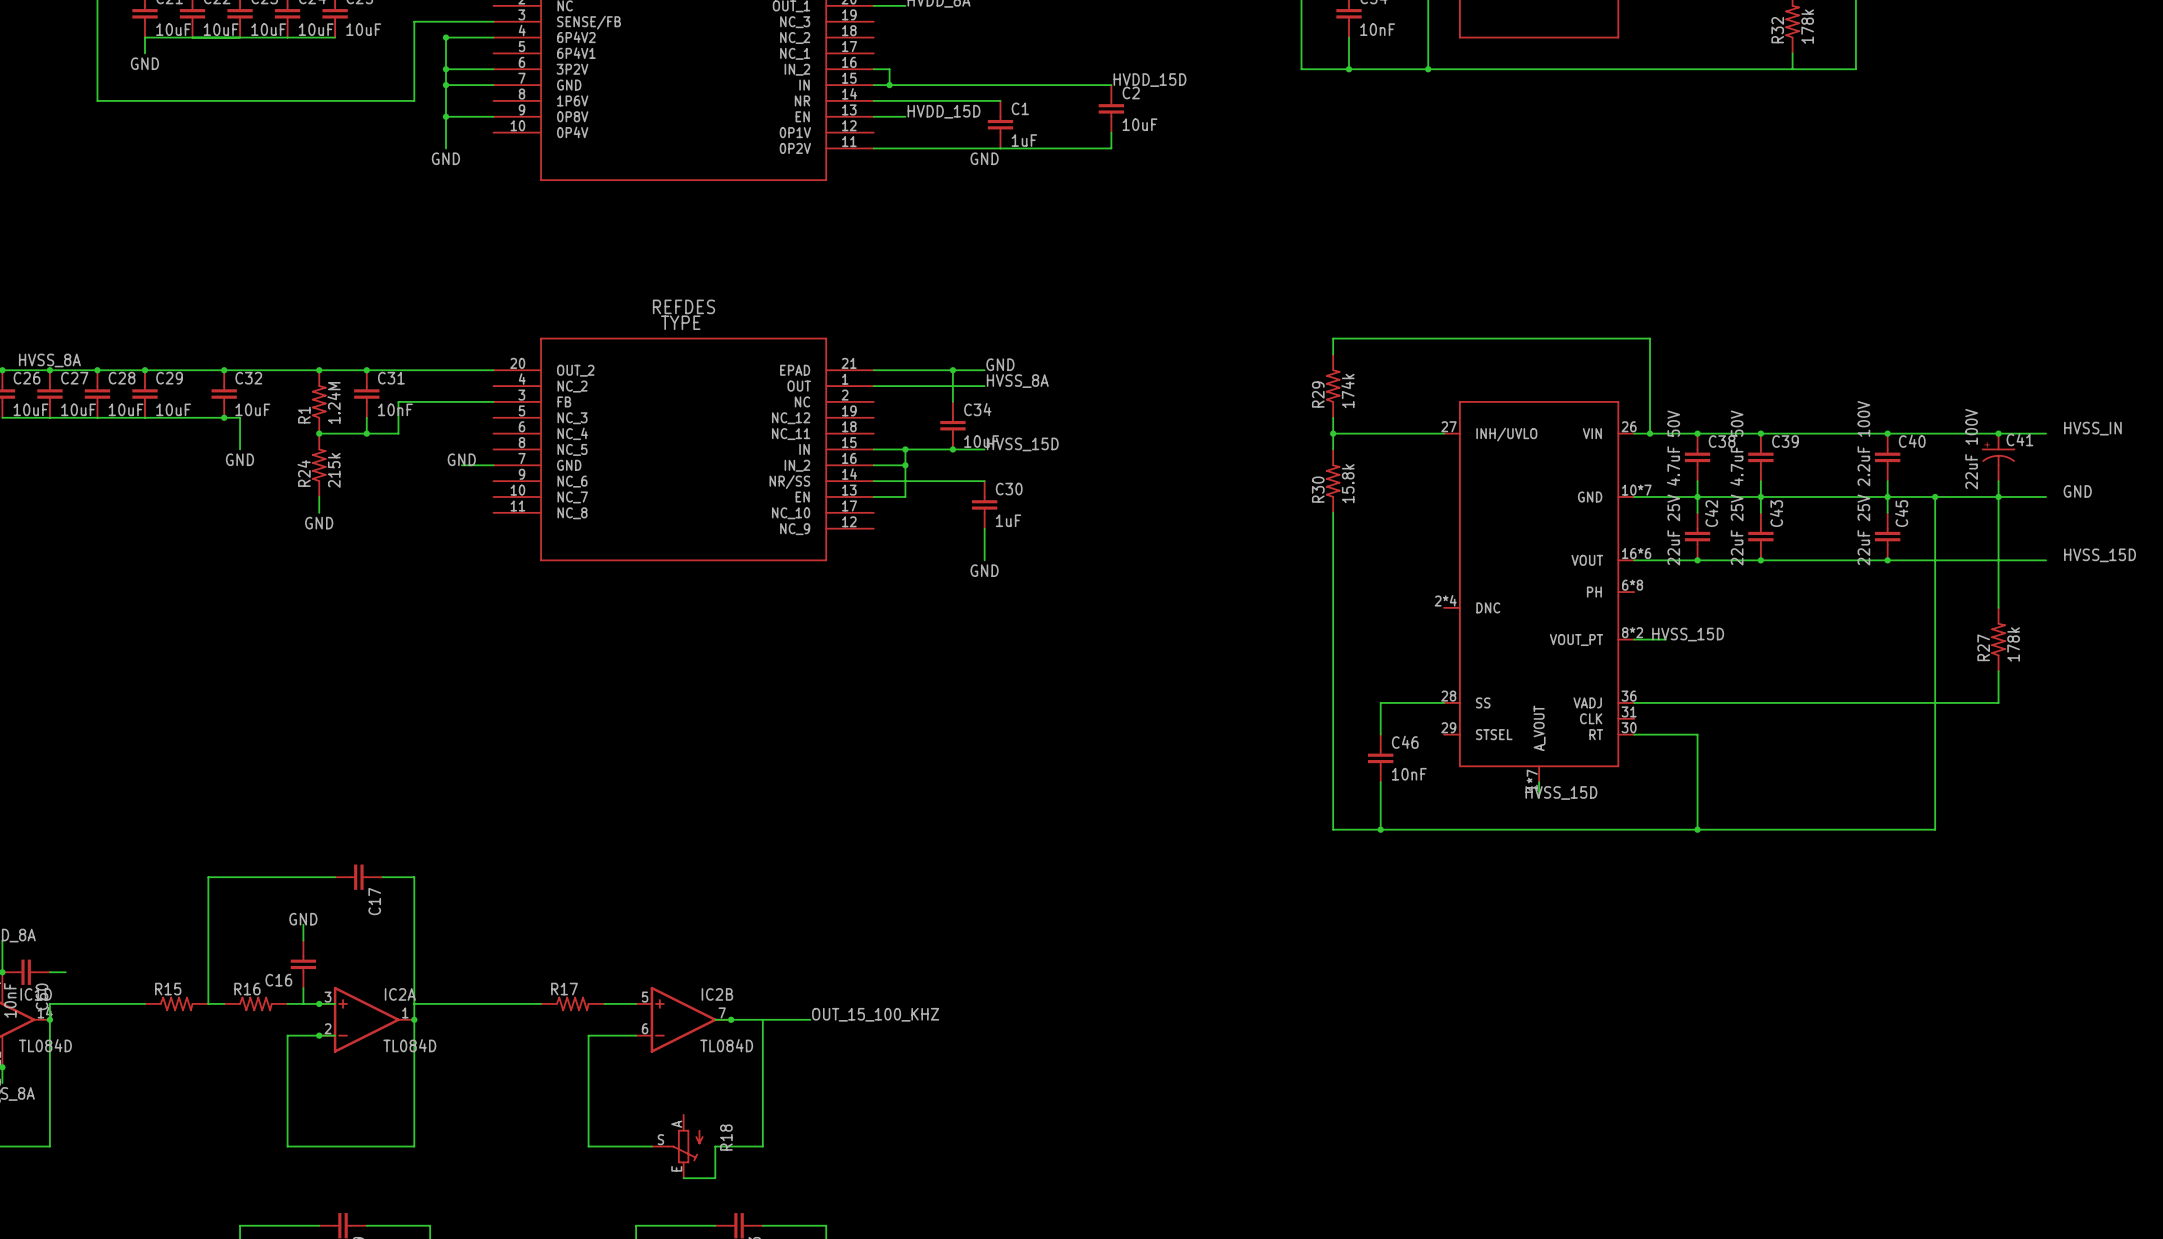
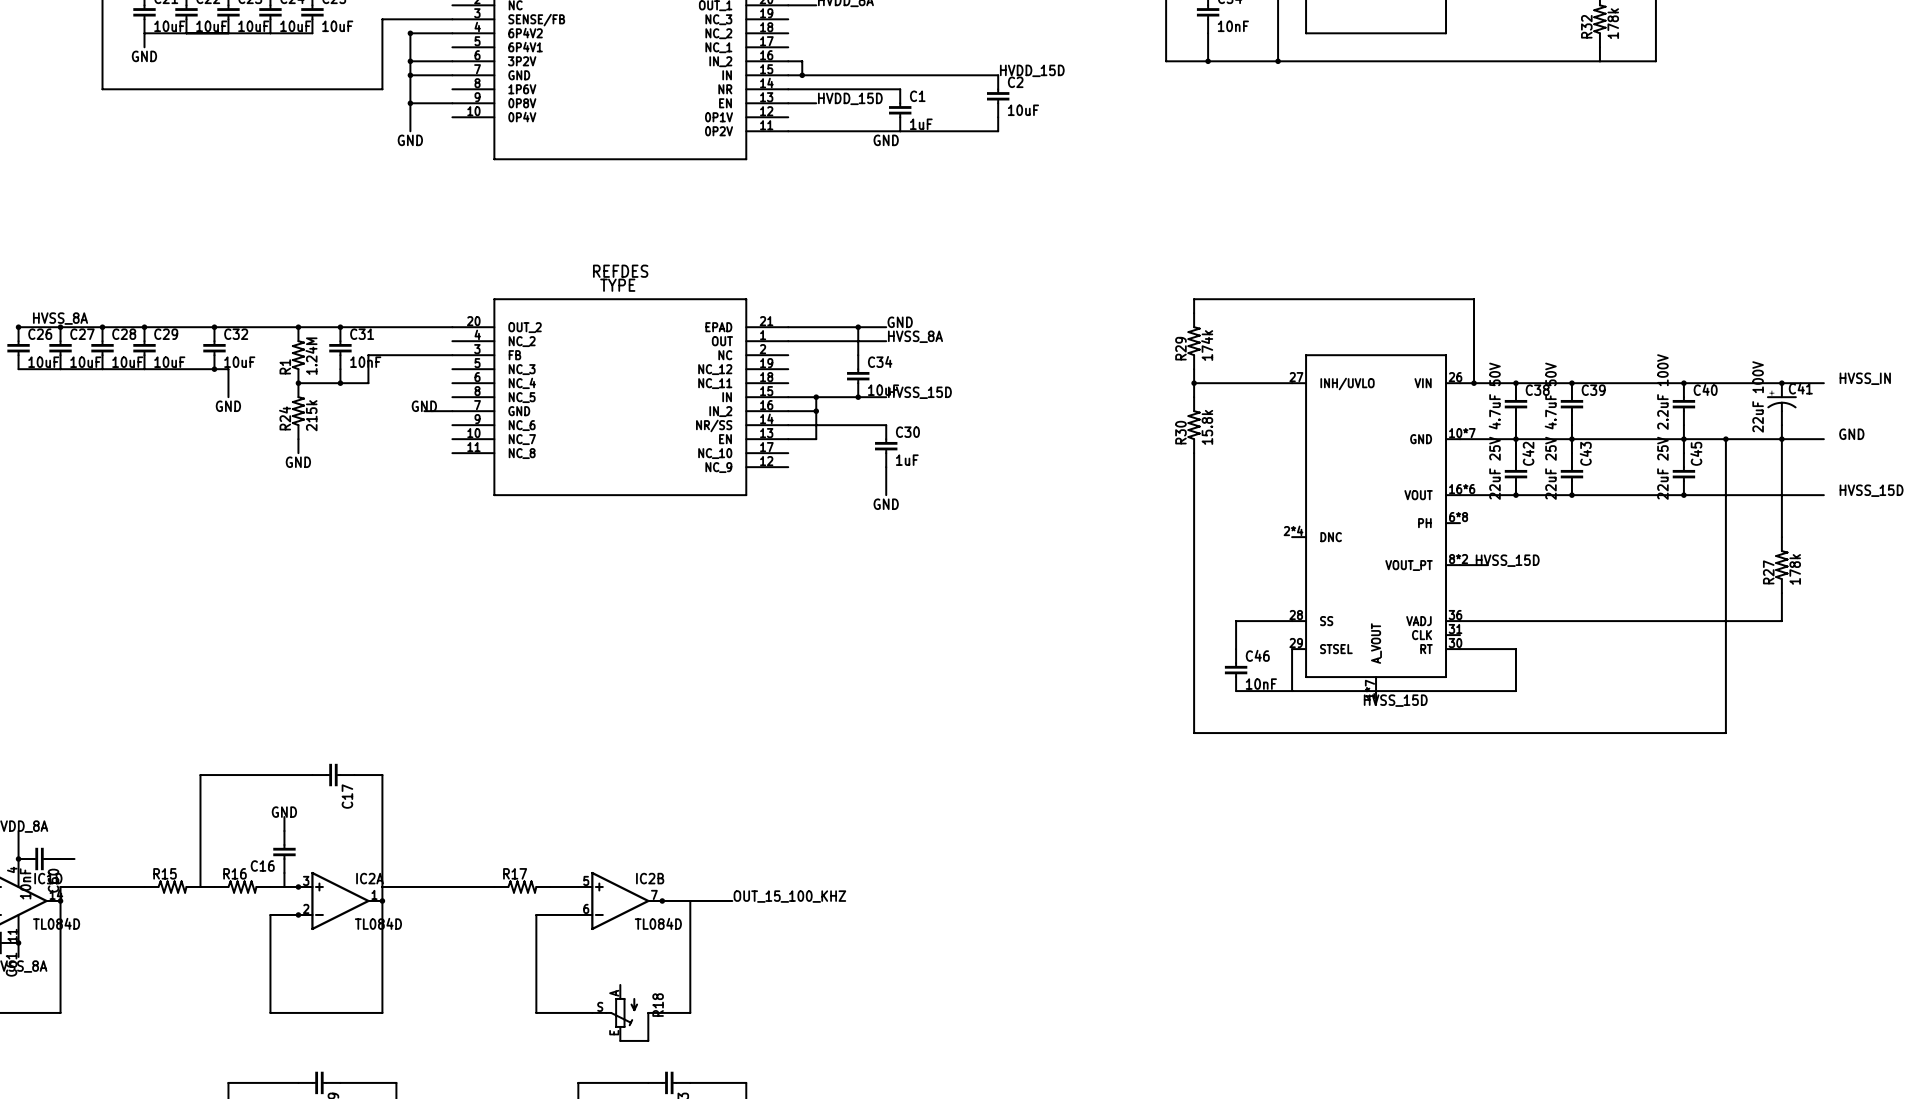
wire: none -> (1292, 649) (1292, 691)
wire: (1380, 782) (1380, 829) -> (1236, 691) (1515, 691)
wire: (1697, 782) (1697, 829) -> none
junction: (1380, 829) -> none
junction: (1697, 829) -> none

